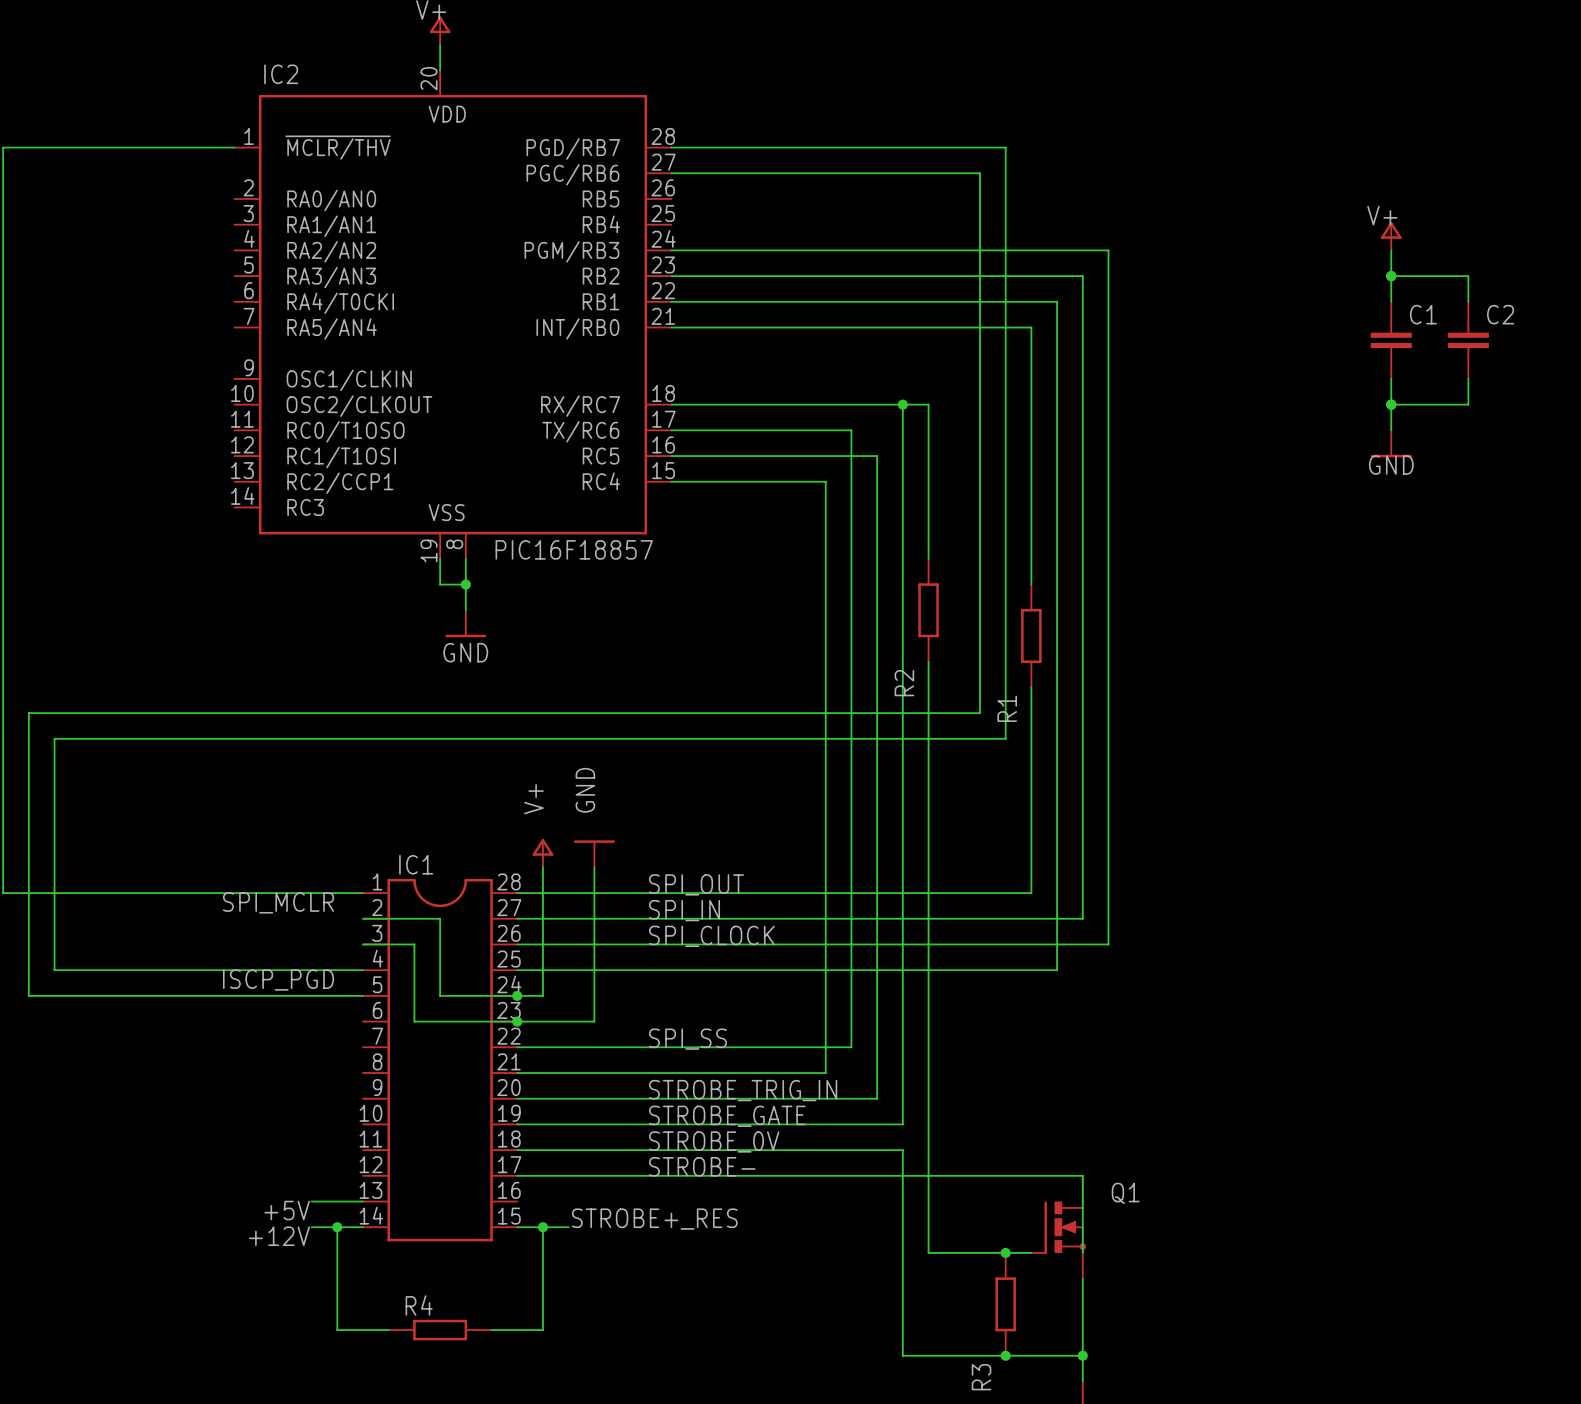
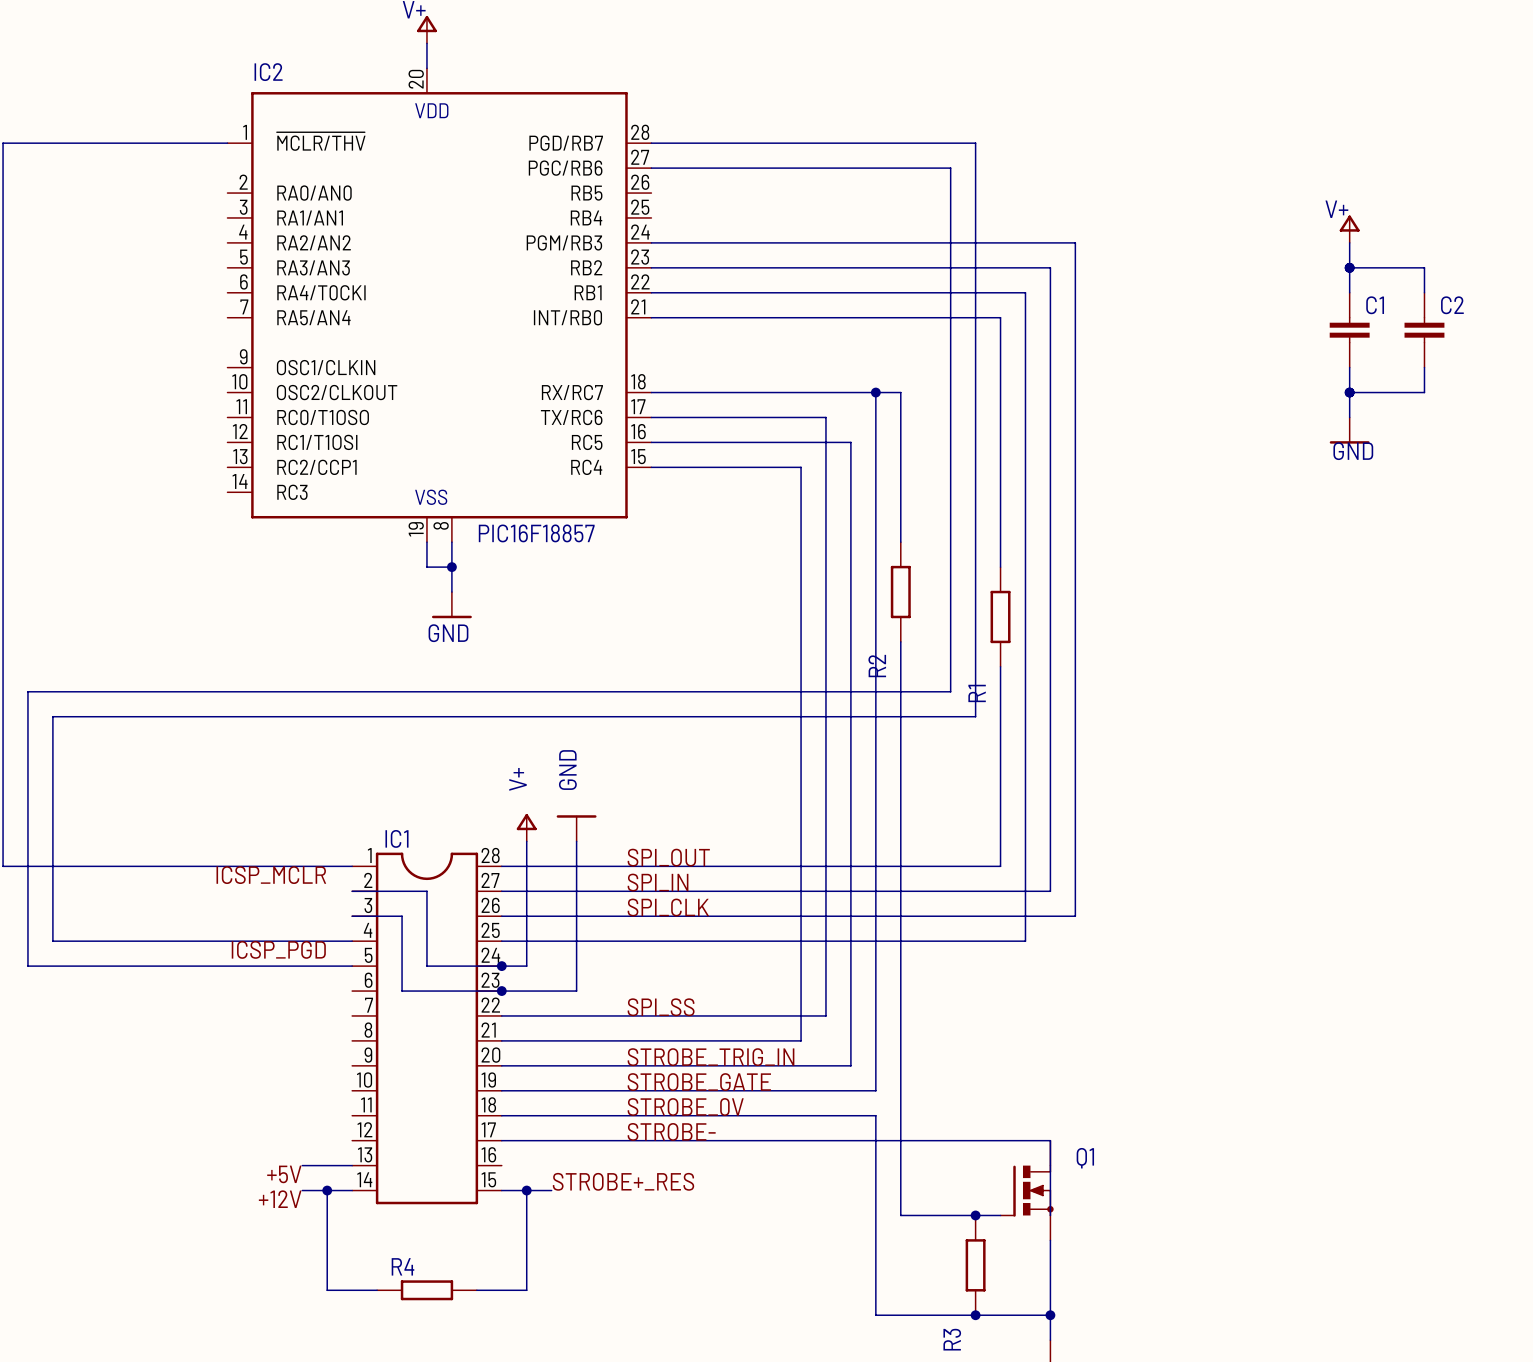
label: SPI_MCLR (278, 902) -> ICSP_MCLR (271, 875)
label: SPI_CLOCK (711, 936) -> SPI_CLK (668, 907)
label: ISCP_PGD (278, 980) -> ICSP_PGD (278, 949)

